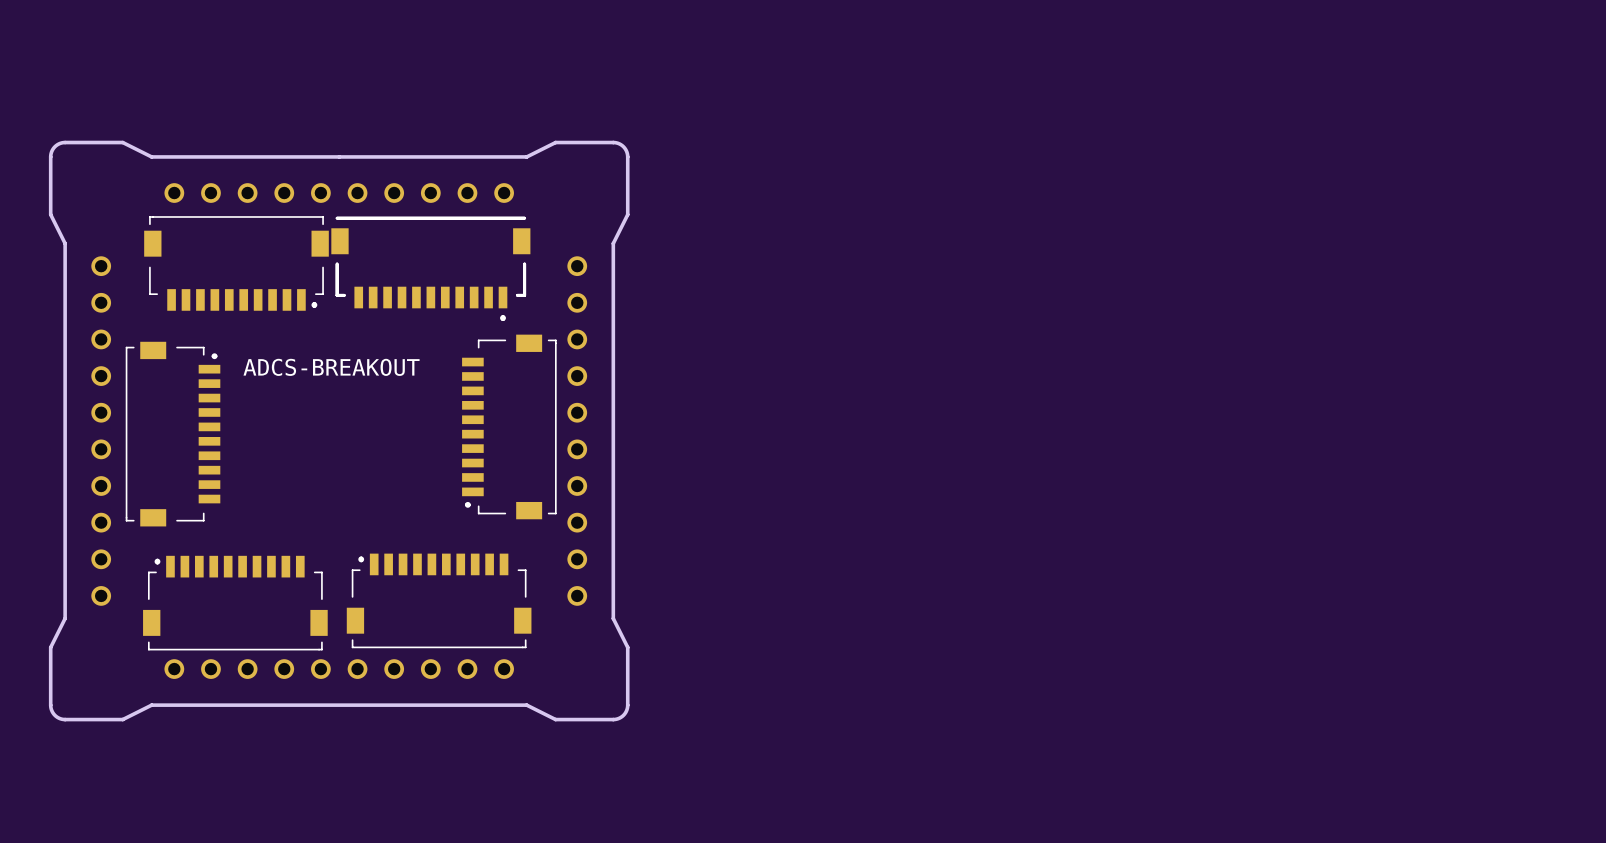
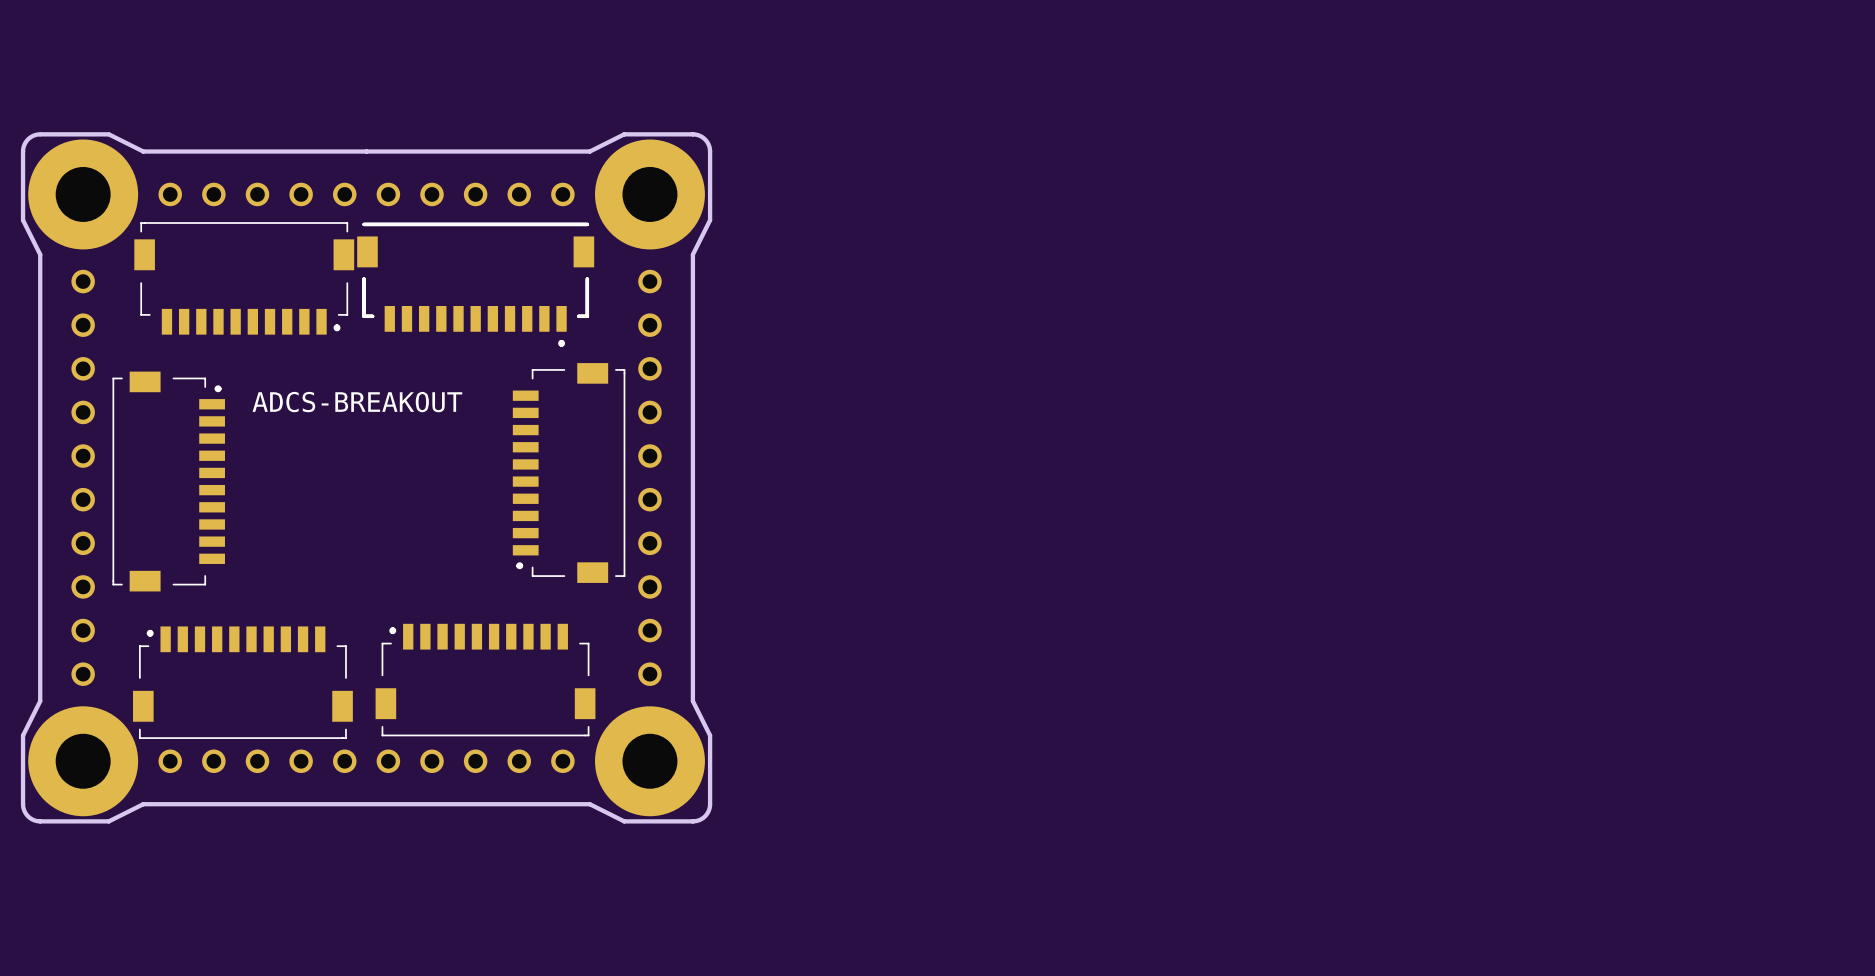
part: none -> (83, 194)
part: none -> (649, 194)
part: none -> (83, 761)
part: none -> (649, 761)

